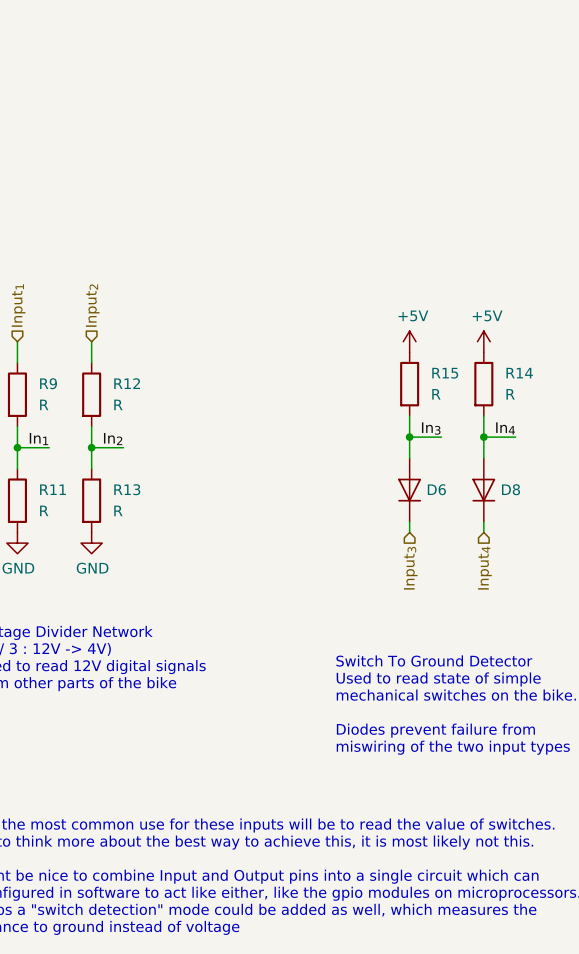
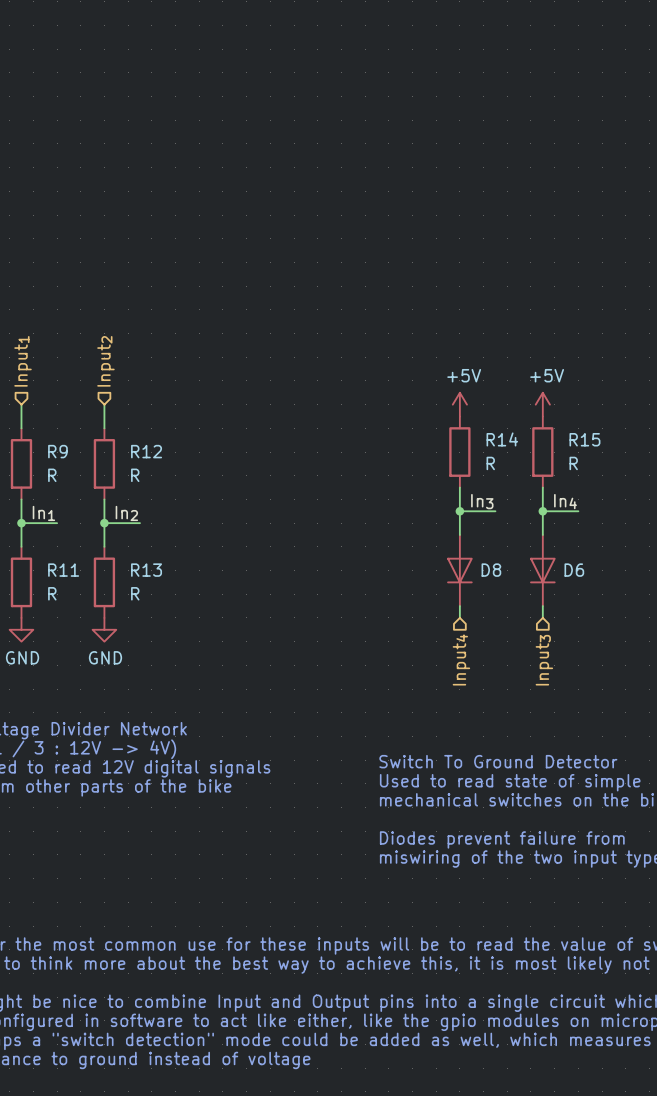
R15 name: R15 (445, 373) -> R14 (502, 439)
R14 name: R14 (519, 373) -> R15 (584, 439)
D6 name: D6 (436, 489) -> D8 (491, 570)
D8 name: D8 (511, 489) -> D6 (574, 570)
hierarchical label: Input3 (410, 568) -> Input4 (461, 659)
hierarchical label: Input4 (484, 568) -> Input3 (544, 660)

